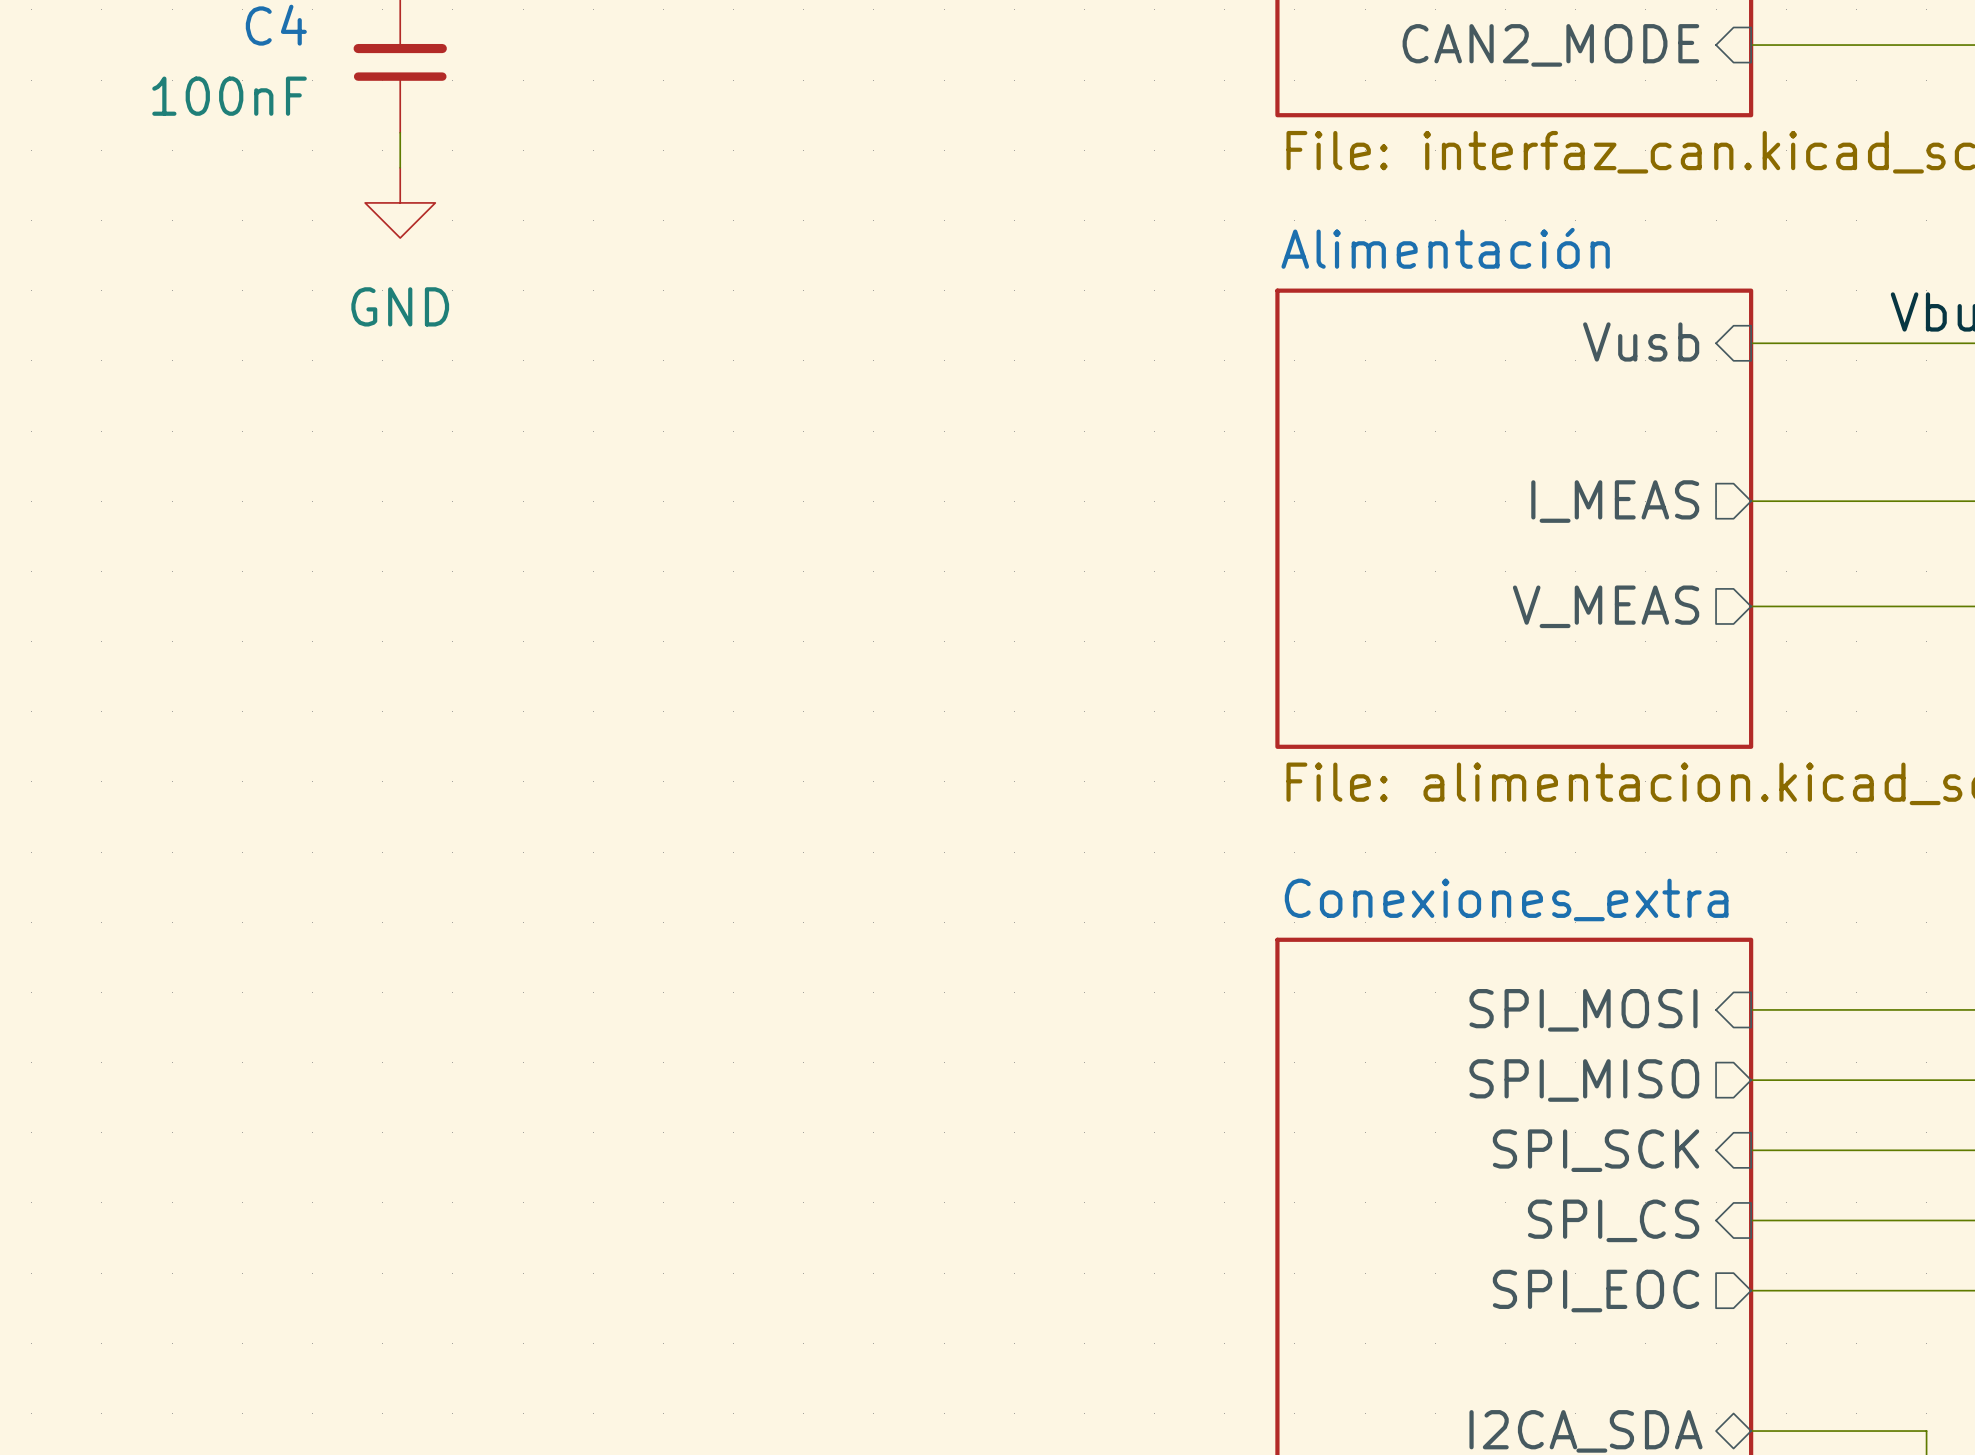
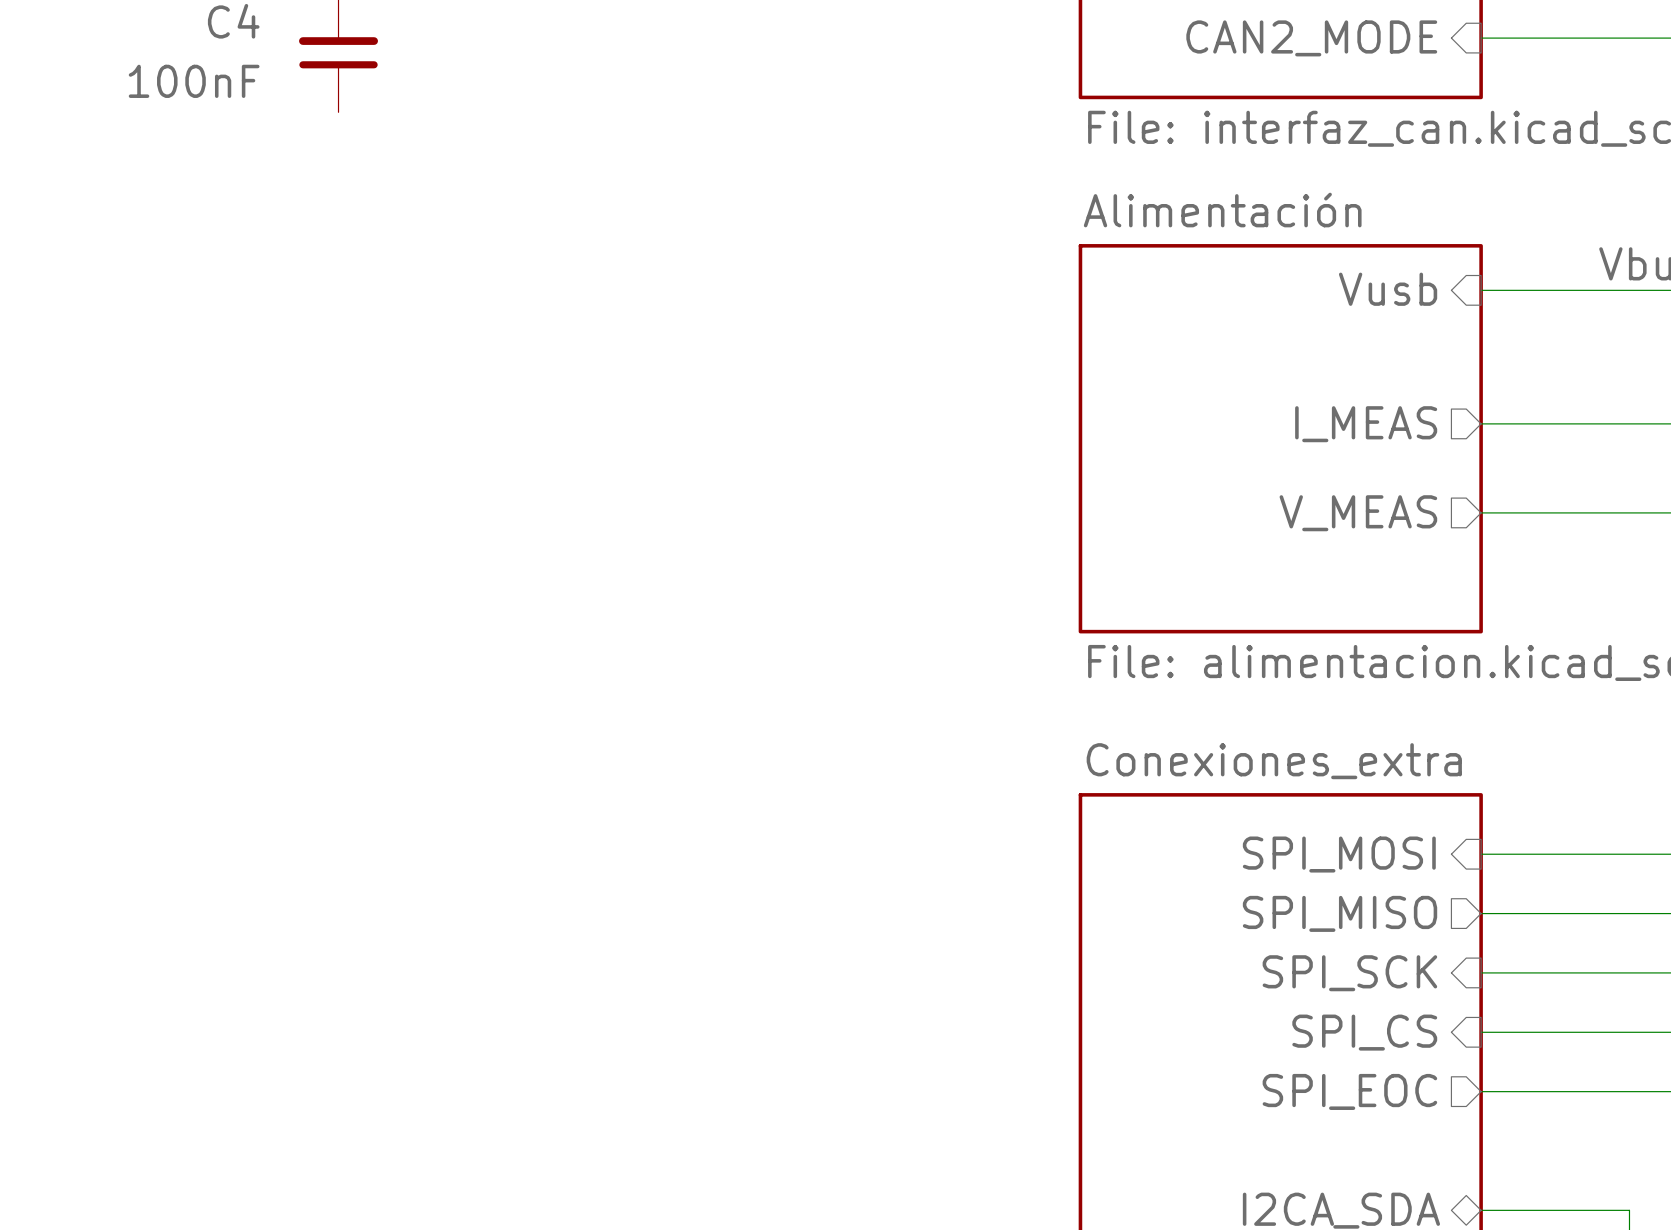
wire: (400, 132) (400, 167) -> none
power symbol: GND (400, 202) -> none

